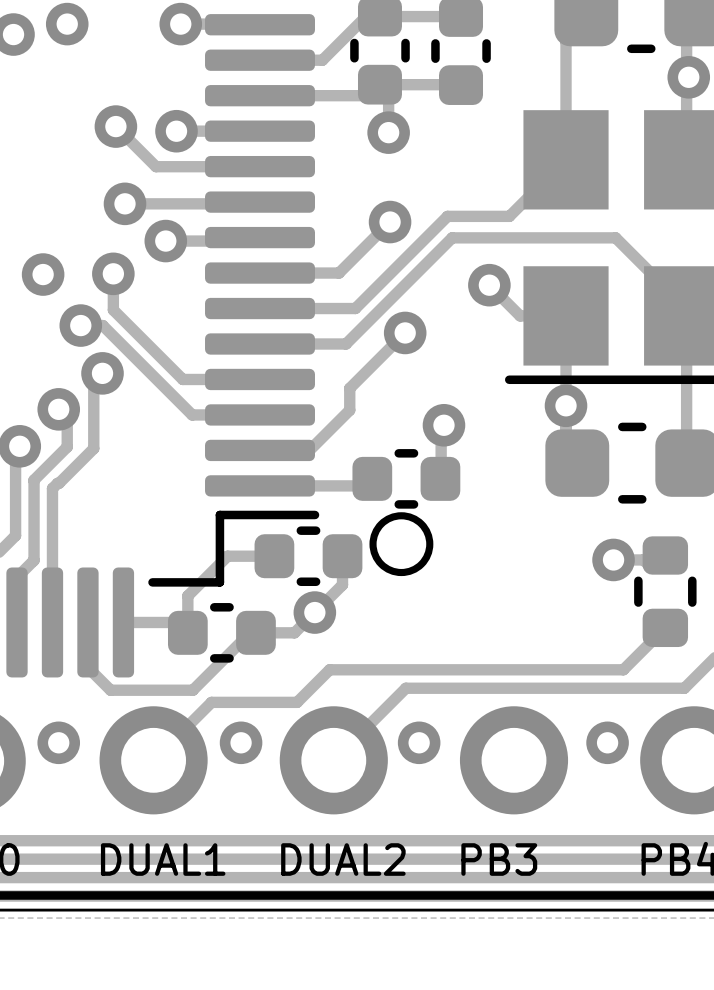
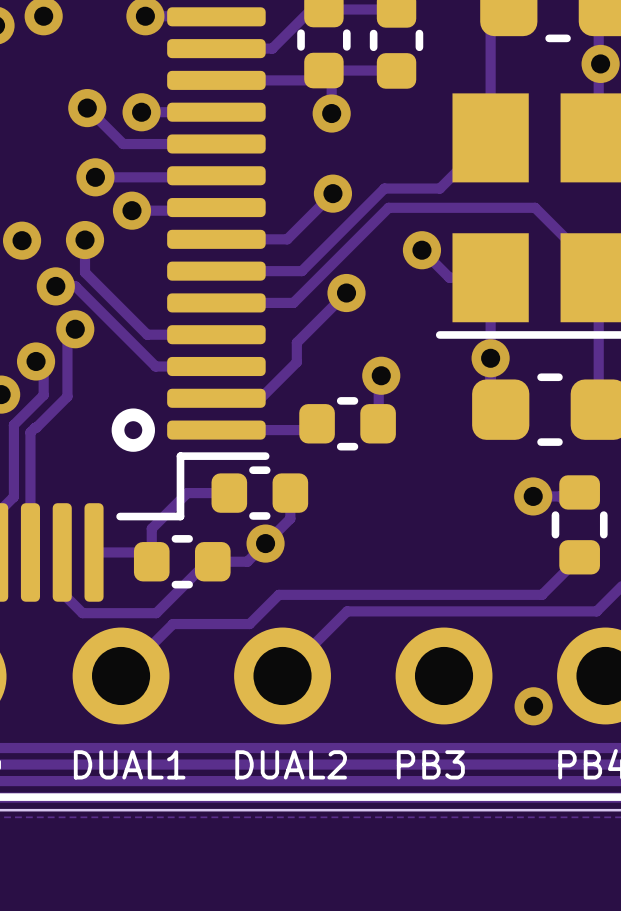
drawing: none -> [111, 408, 155, 452]
drawing: [369, 512, 434, 577] -> none
via: (58, 742) -> none
via: (241, 742) -> none
via: (419, 742) -> none
via position: (607, 742) -> (533, 706)

